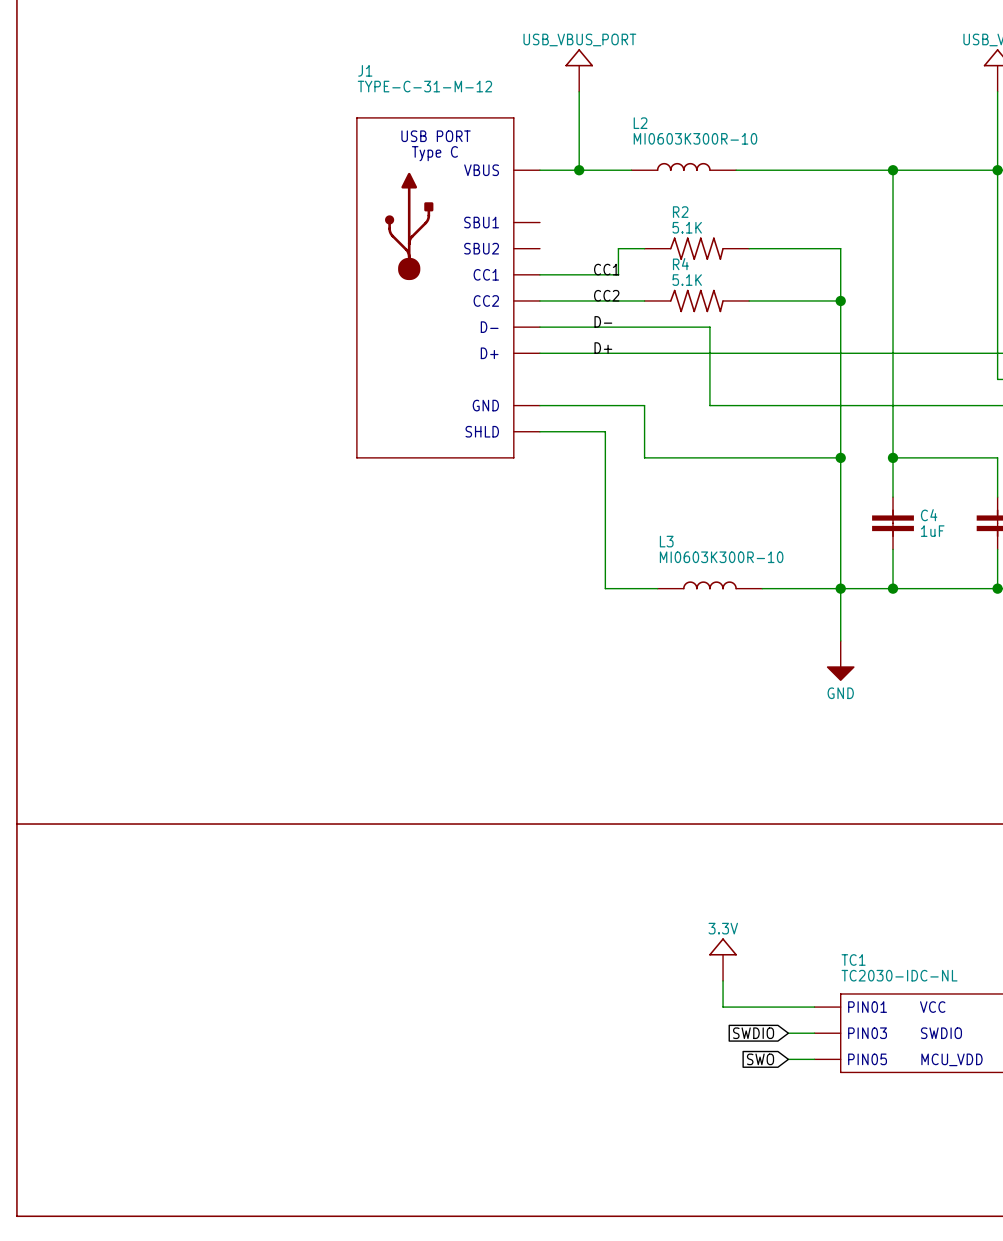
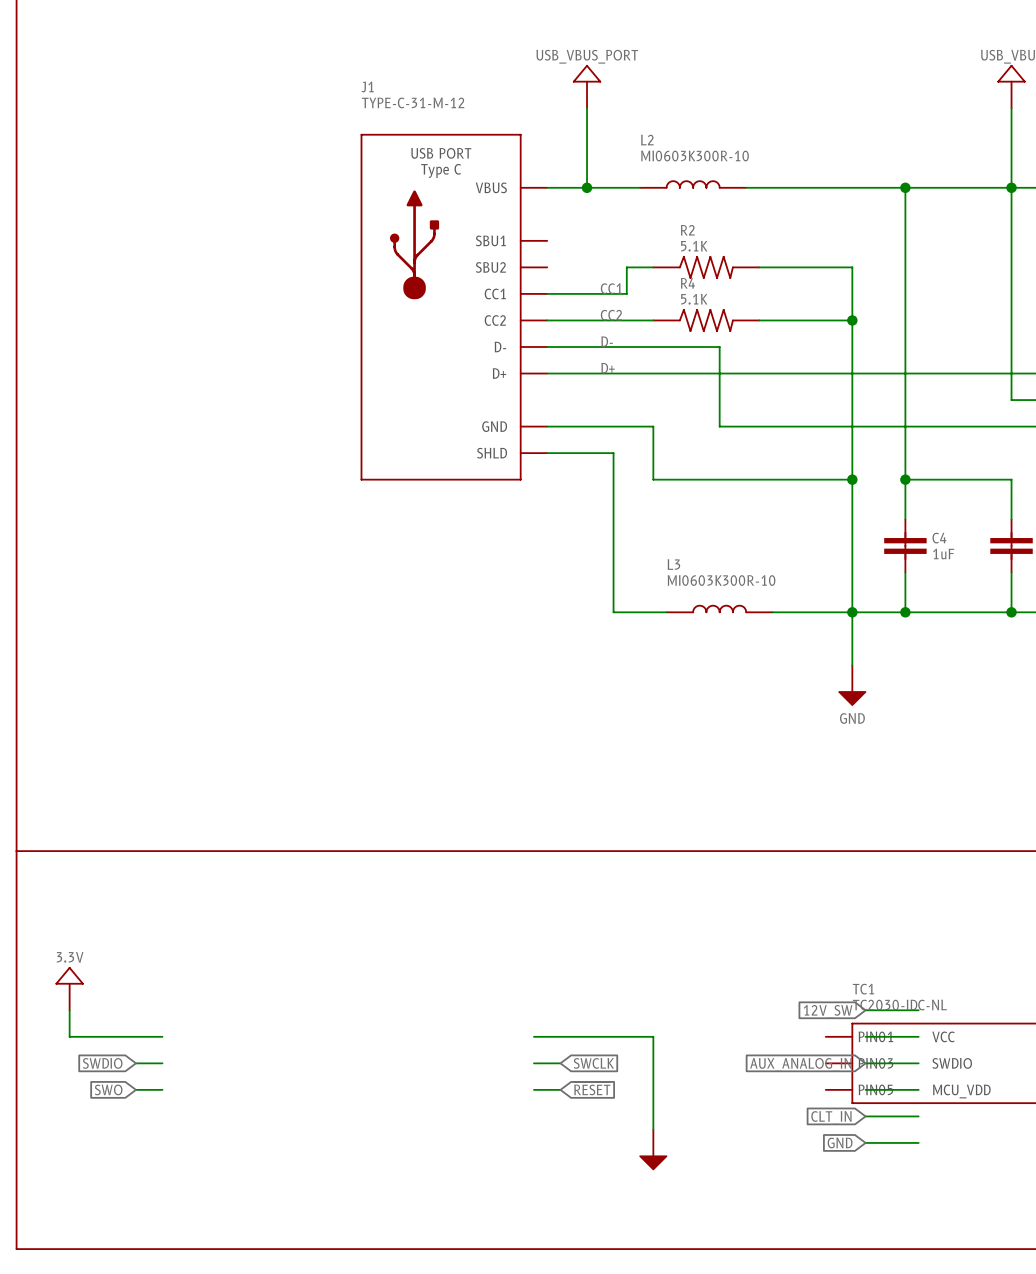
power symbol: none -> 3.3V (69, 988)
power symbol: 3.3V (723, 959) -> none
wire: none -> (69, 1010) (69, 1036) (162, 1036)
wire: (723, 980) (723, 1007) (814, 1007) -> none
wire: none -> (865, 1010) (918, 1010)
global label: none -> 12V_SW (828, 1011)
wire: none -> (533, 1036) (653, 1036) (653, 1129)
wire: none -> (865, 1036) (918, 1036)
global label: none -> SWDIO (102, 1063)
wire: none -> (135, 1063) (162, 1063)
wire: none -> (533, 1063) (560, 1063)
global label: none -> SWCLK (593, 1063)
global label: SWDIO (753, 1033) -> none
global label: none -> AUX_ANALOG_IN (800, 1064)
wire: (788, 1033) (814, 1033) -> none
wire: none -> (865, 1063) (918, 1063)
global label: none -> ~{RESET} (592, 1088)
global label: none -> SWO (108, 1089)
wire: none -> (135, 1089) (162, 1089)
wire: none -> (533, 1089) (560, 1089)
global label: SWO (760, 1059) -> none
wire: (788, 1059) (814, 1059) -> none
wire: none -> (865, 1089) (918, 1089)
wire: none -> (865, 1116) (918, 1116)
global label: none -> CLT_IN (831, 1118)
global label: none -> GND (840, 1143)
wire: none -> (865, 1142) (918, 1142)
power symbol: none -> (653, 1149)

